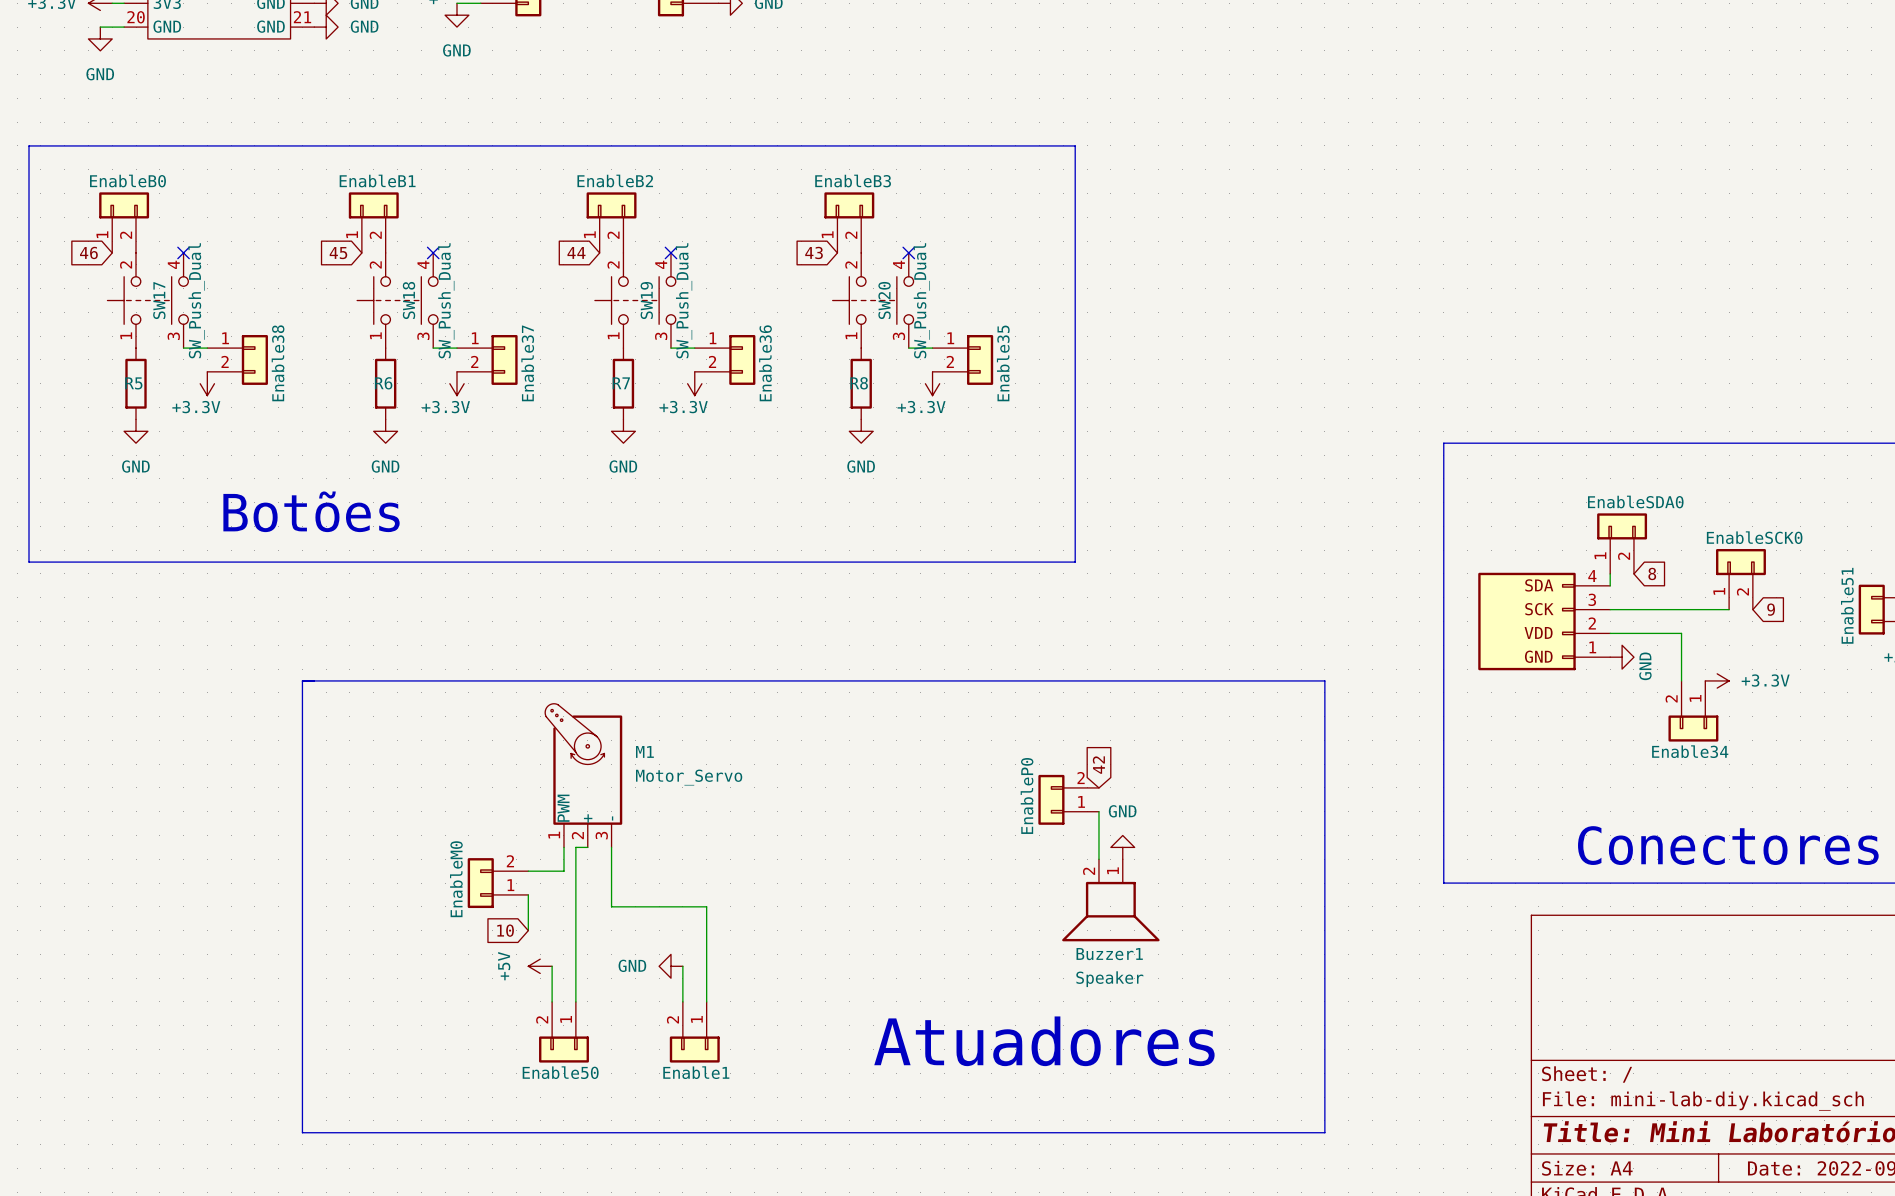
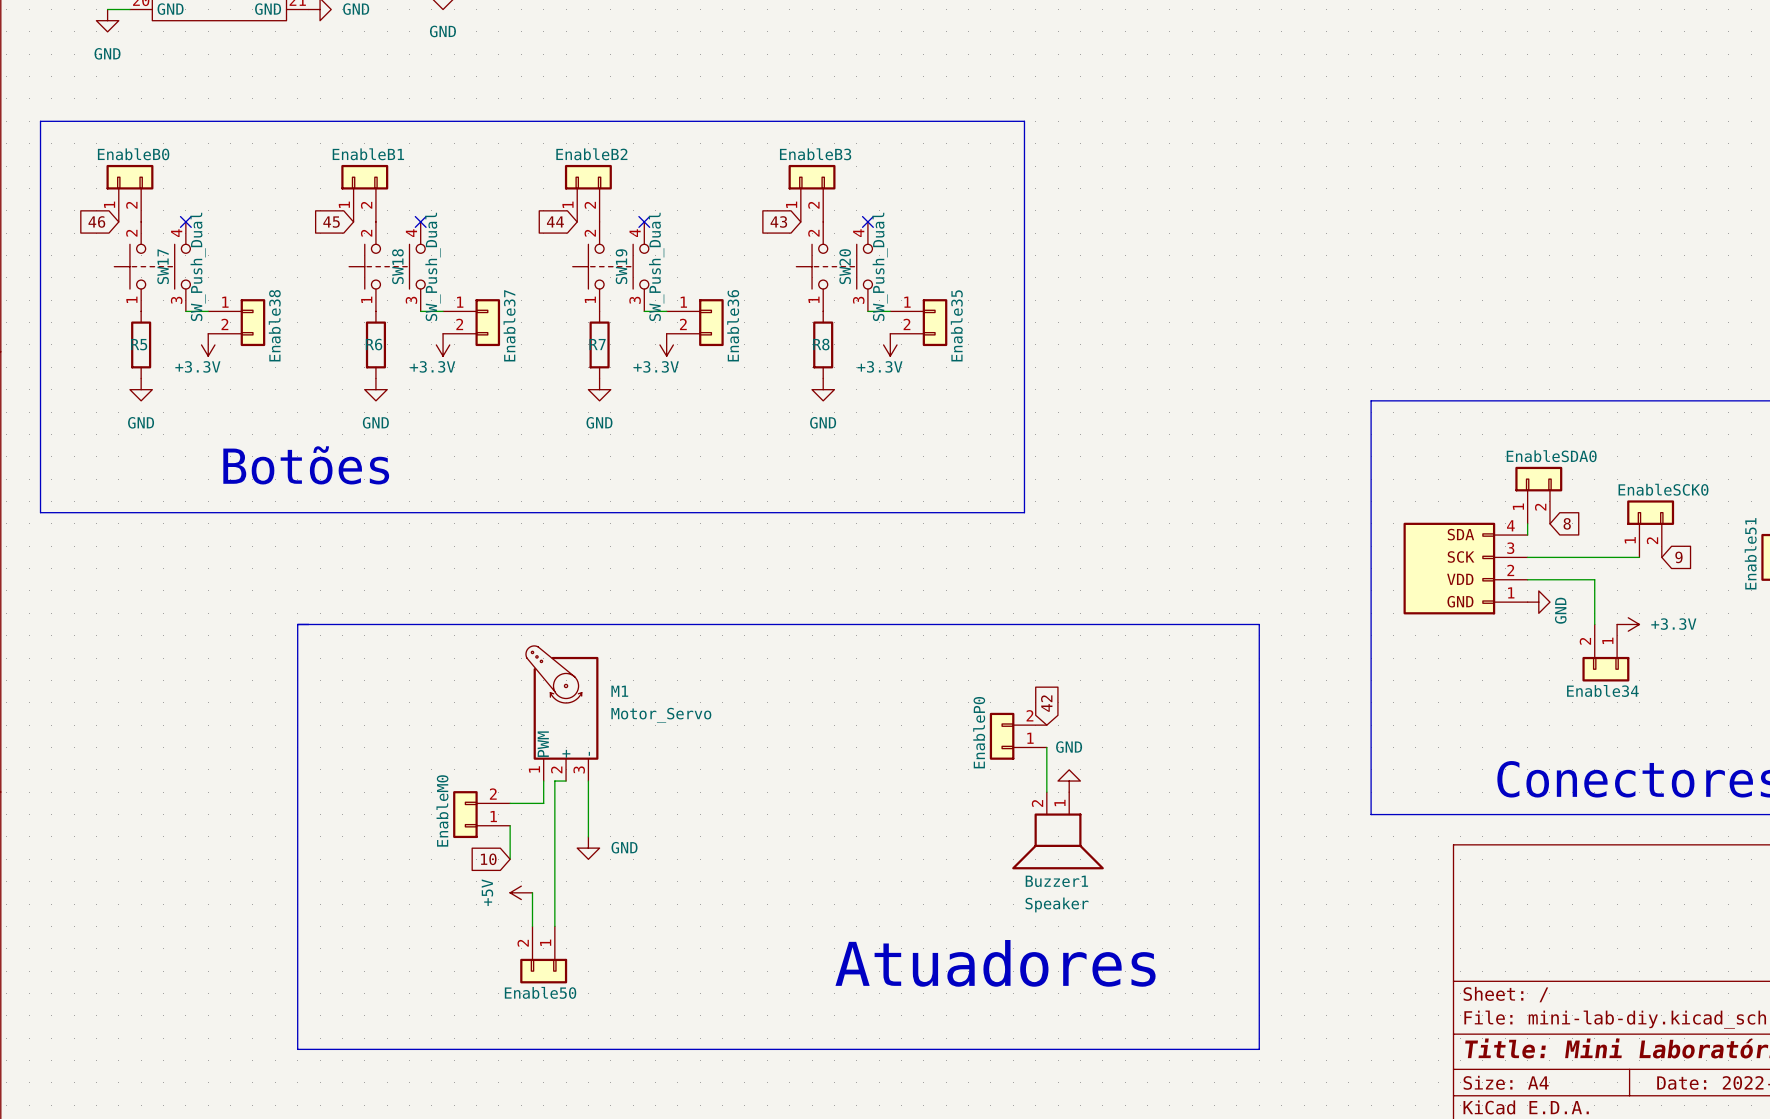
wire: (611, 906) (706, 906) (706, 1001) -> none
power symbol text position: GND (632, 965) -> GND (624, 847)
power symbol rotation: 0° (670, 966) -> 90° counterclockwise (588, 848)
power symbol position: GND (670, 966) -> GND (588, 848)
wire: (682, 966) (682, 1001) -> none
Enable1: (694, 1032) -> none

